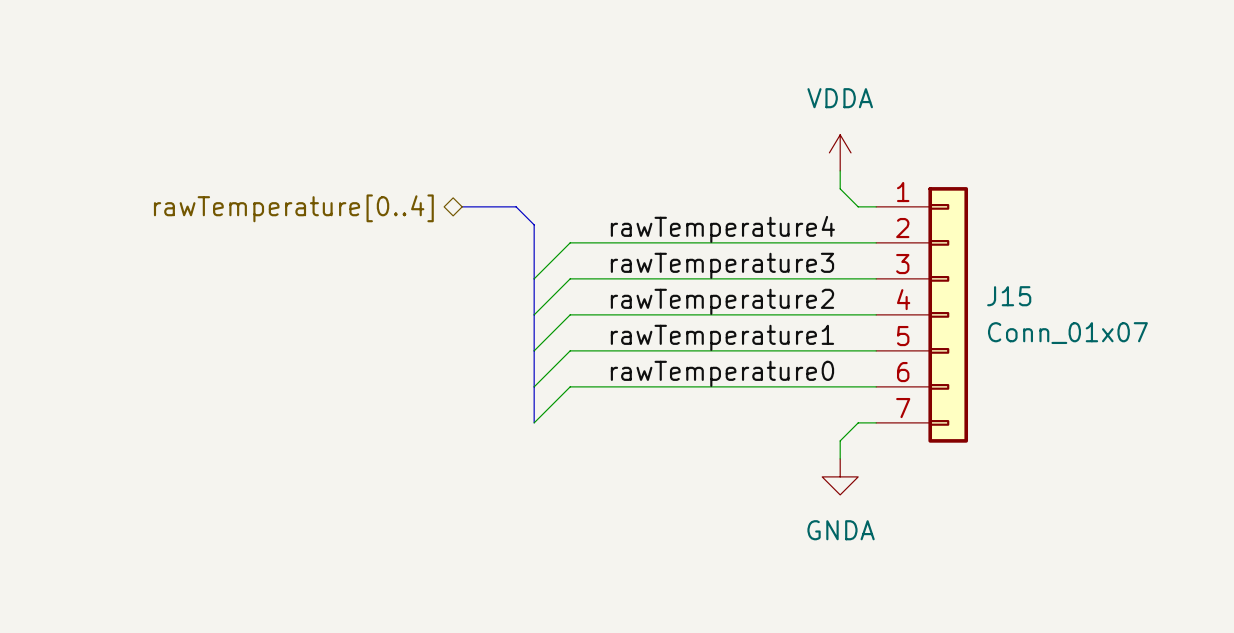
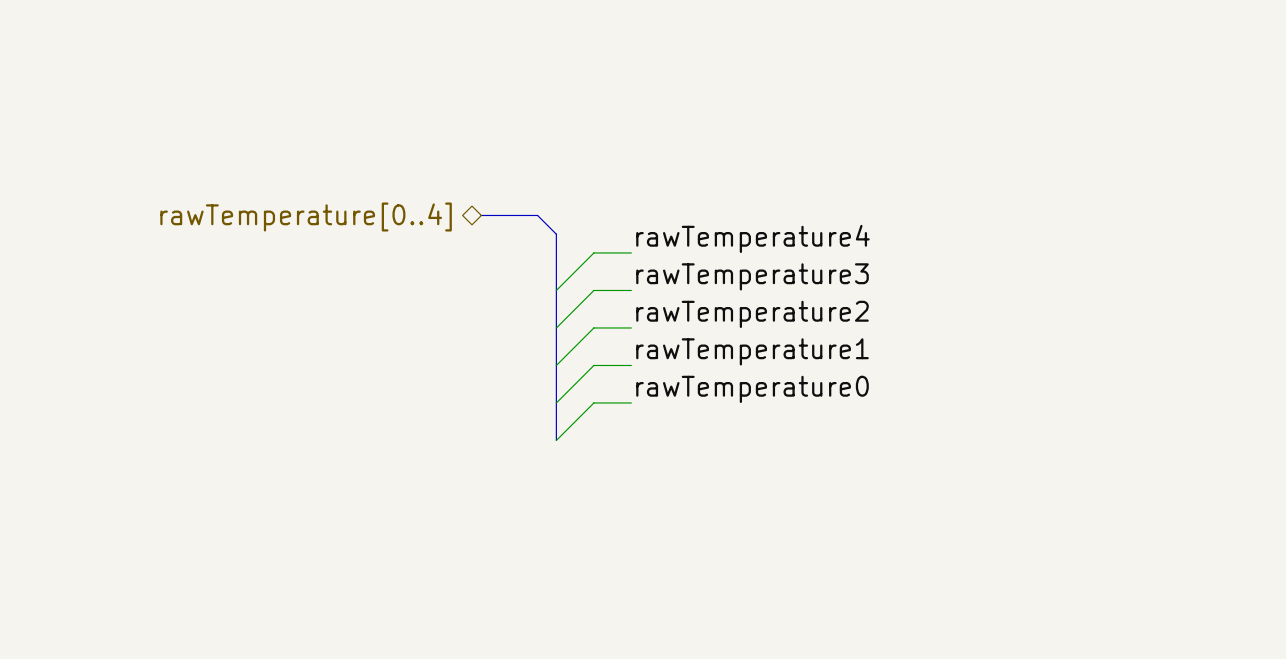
power symbol: VDDA (840, 152) -> none
wire: (840, 170) (840, 188) (858, 206) (876, 206) -> none
wire: (606, 242) (876, 242) -> none
wire: (606, 278) (876, 278) -> none
wire: (606, 314) (876, 314) -> none
J15: Conn_01x07 (922, 314) -> none
wire: (606, 350) (876, 350) -> none
wire: (606, 386) (876, 386) -> none
wire: (876, 422) (858, 422) (840, 440) (840, 458) -> none
power symbol: GNDA (840, 476) -> none

